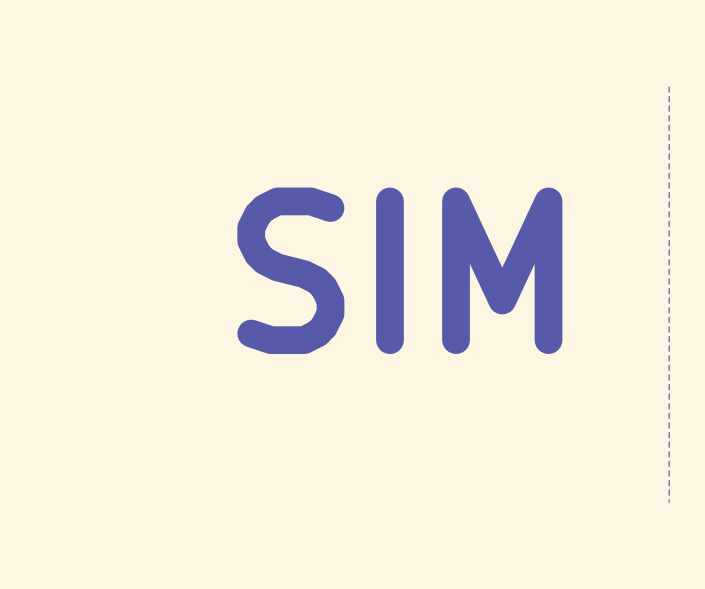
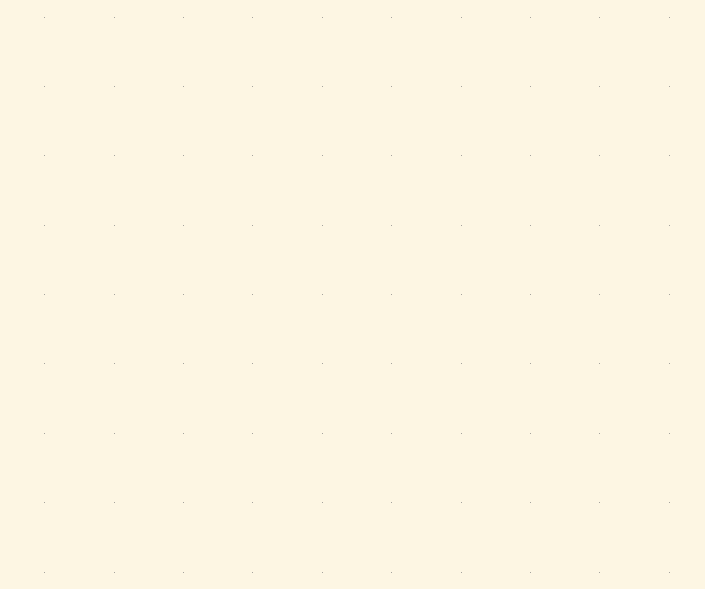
line: (669, 86) (669, 502) -> none
text: SIM (399, 270) -> none

